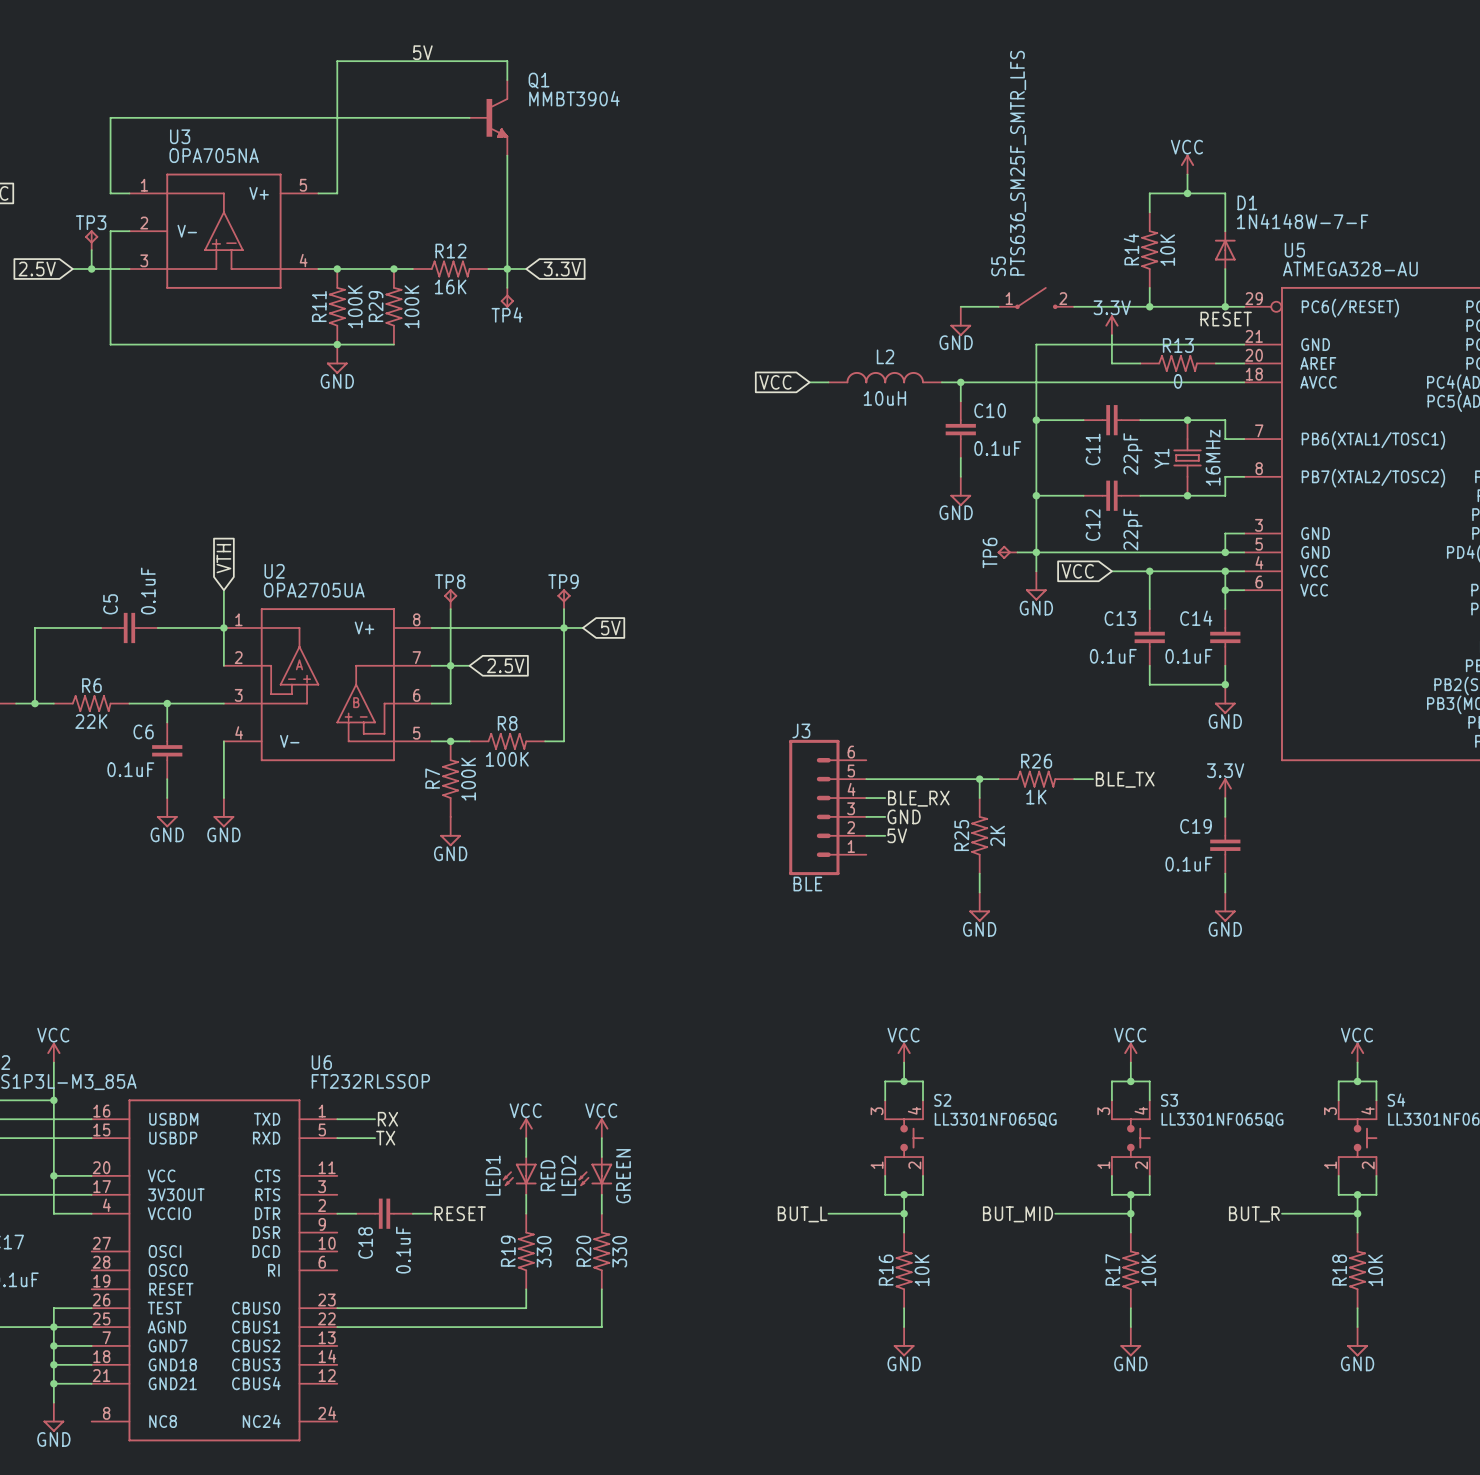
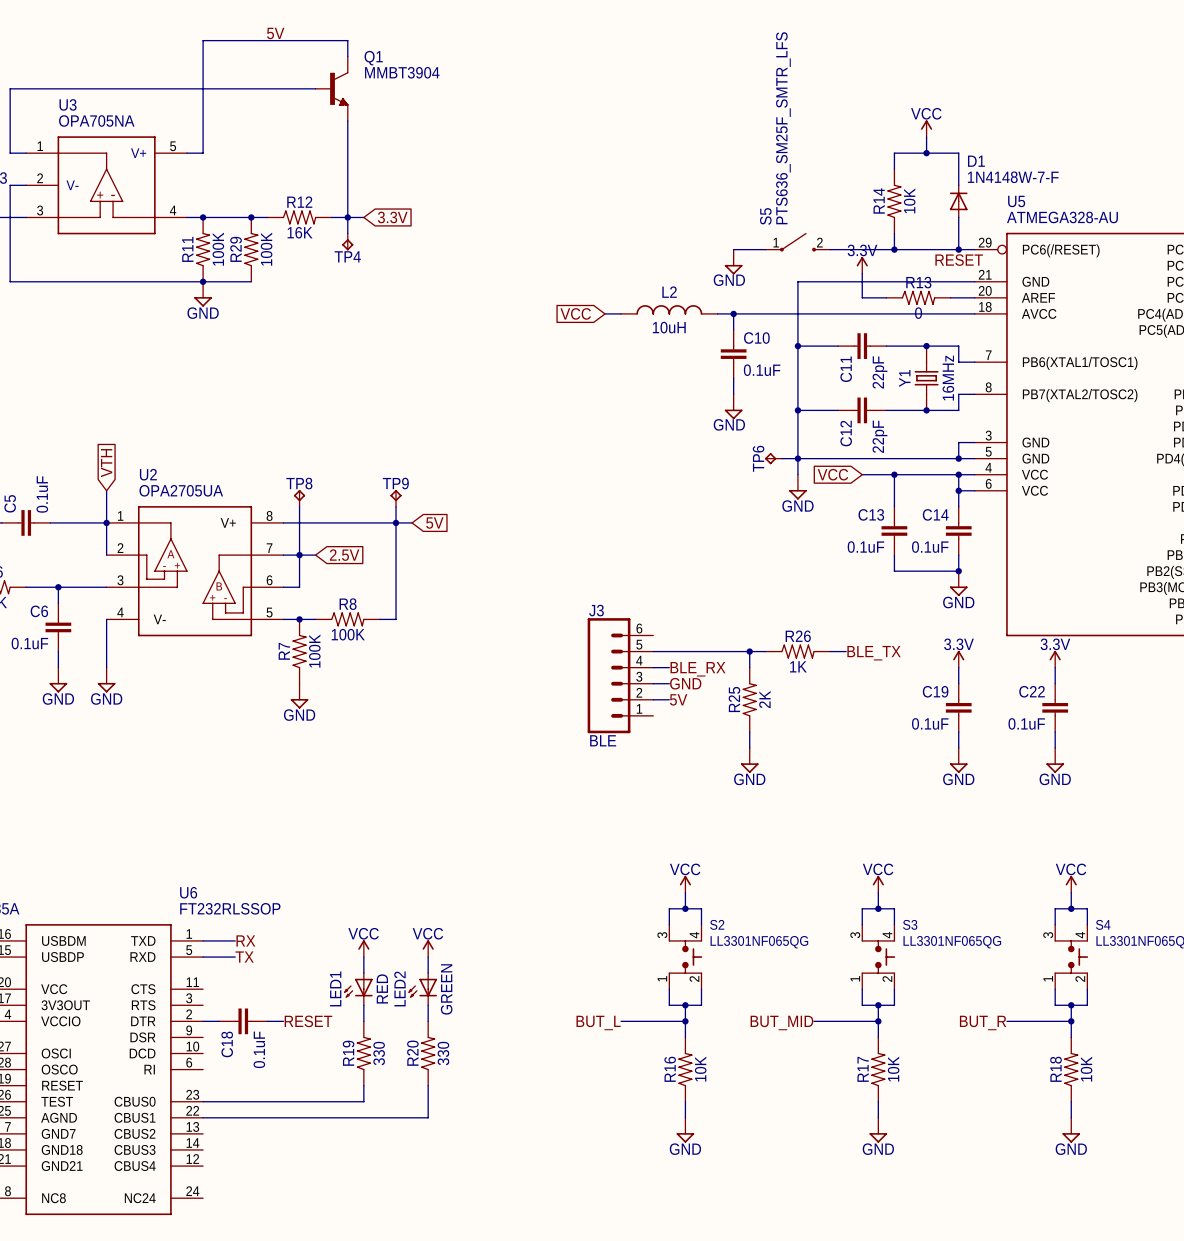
power symbol: none -> 3.3V (1055, 659)
wire: none -> (1055, 667) (1055, 683)
C22: none -> 0.1uF (1055, 707)
wire: none -> (1055, 731) (1055, 748)
power symbol: none -> GND (1055, 760)

